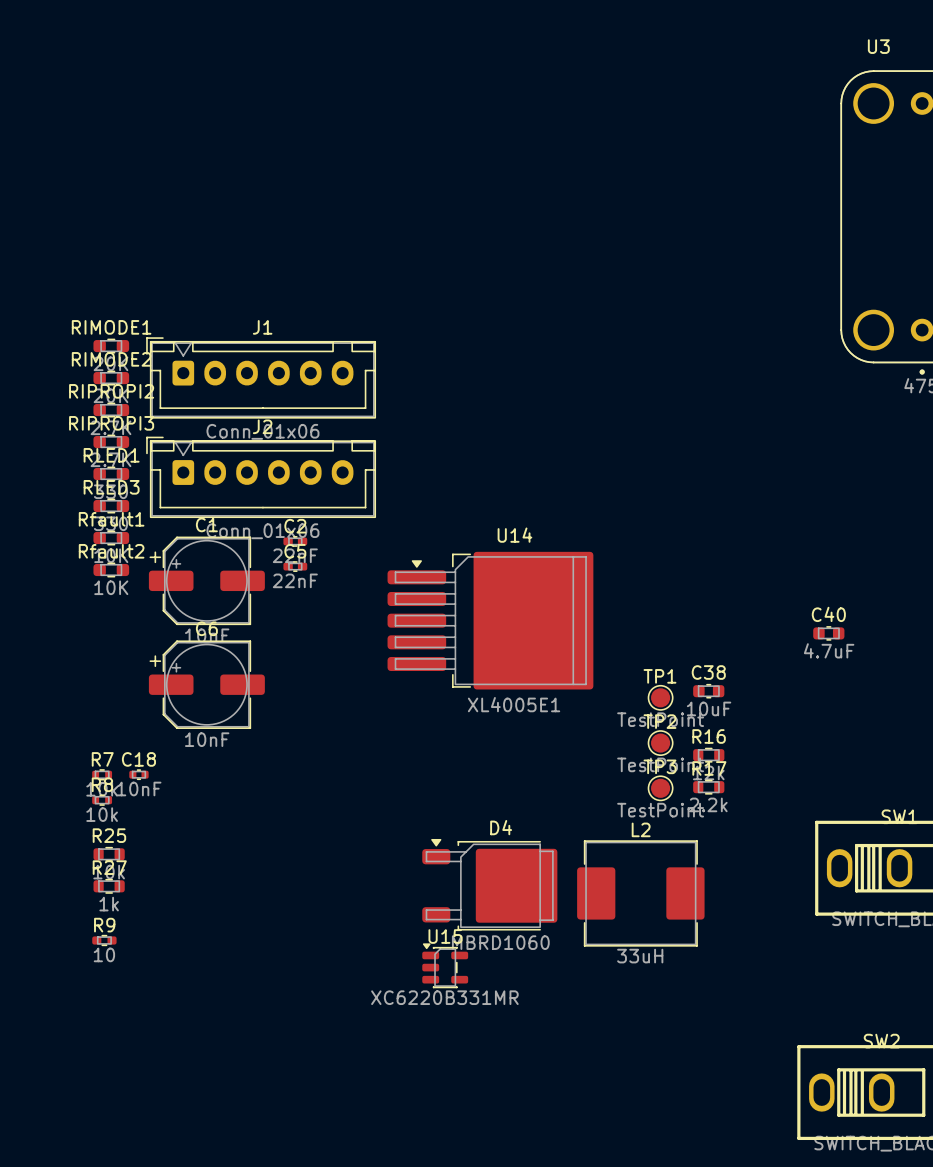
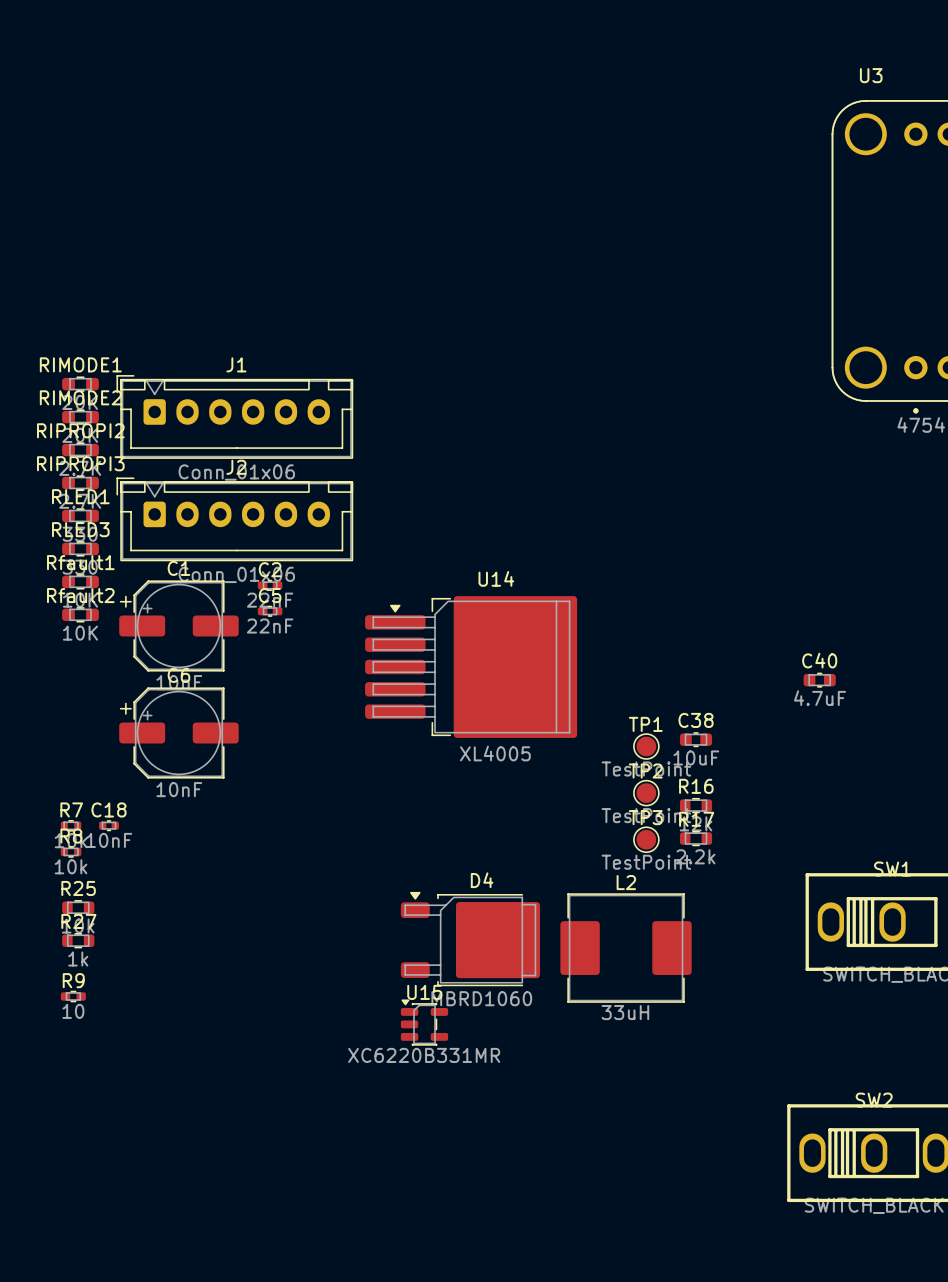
U14 value: XL4005E1 (514, 704) -> XL4005 (495, 753)

